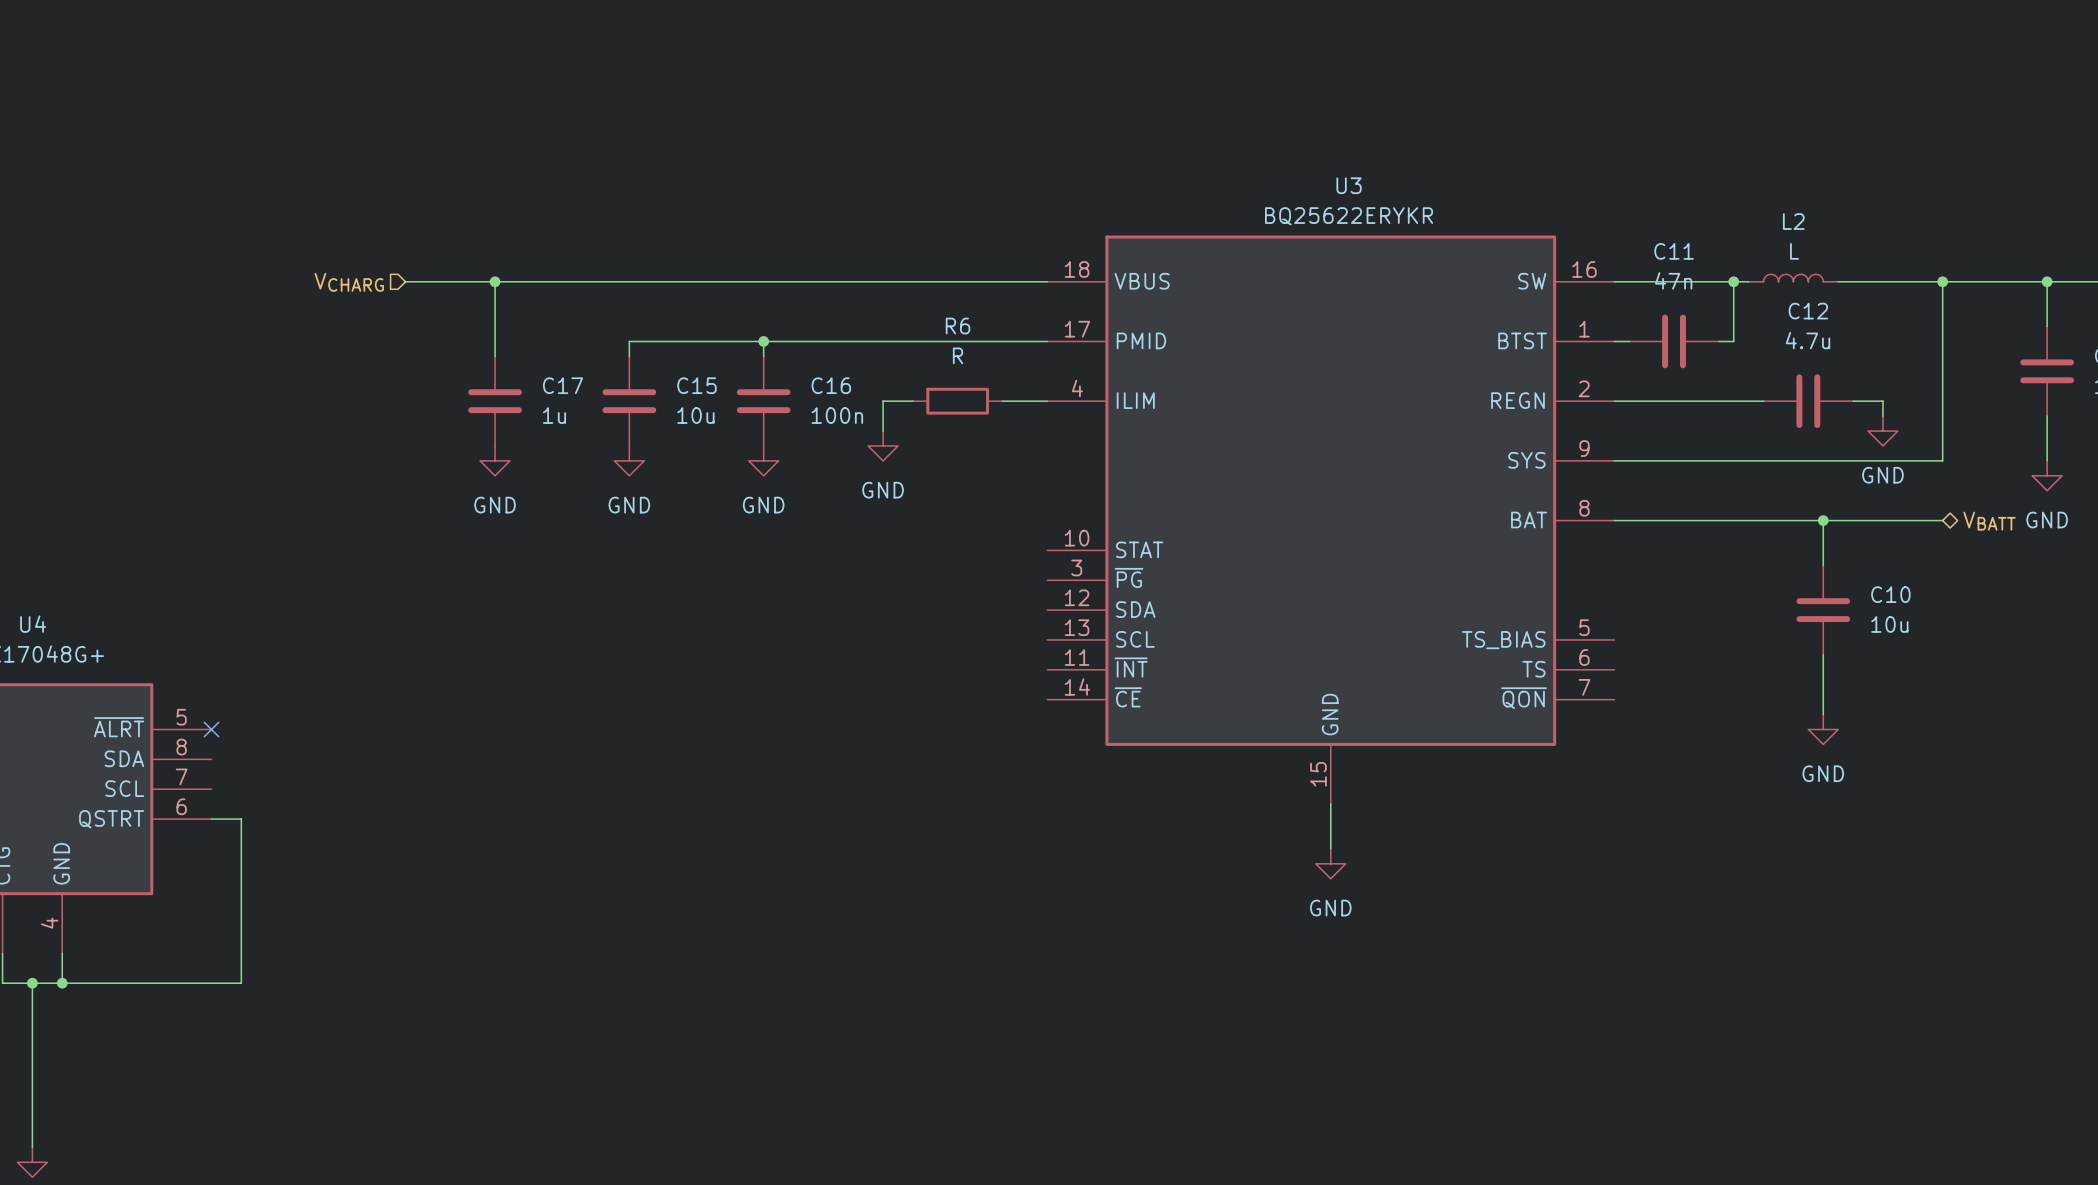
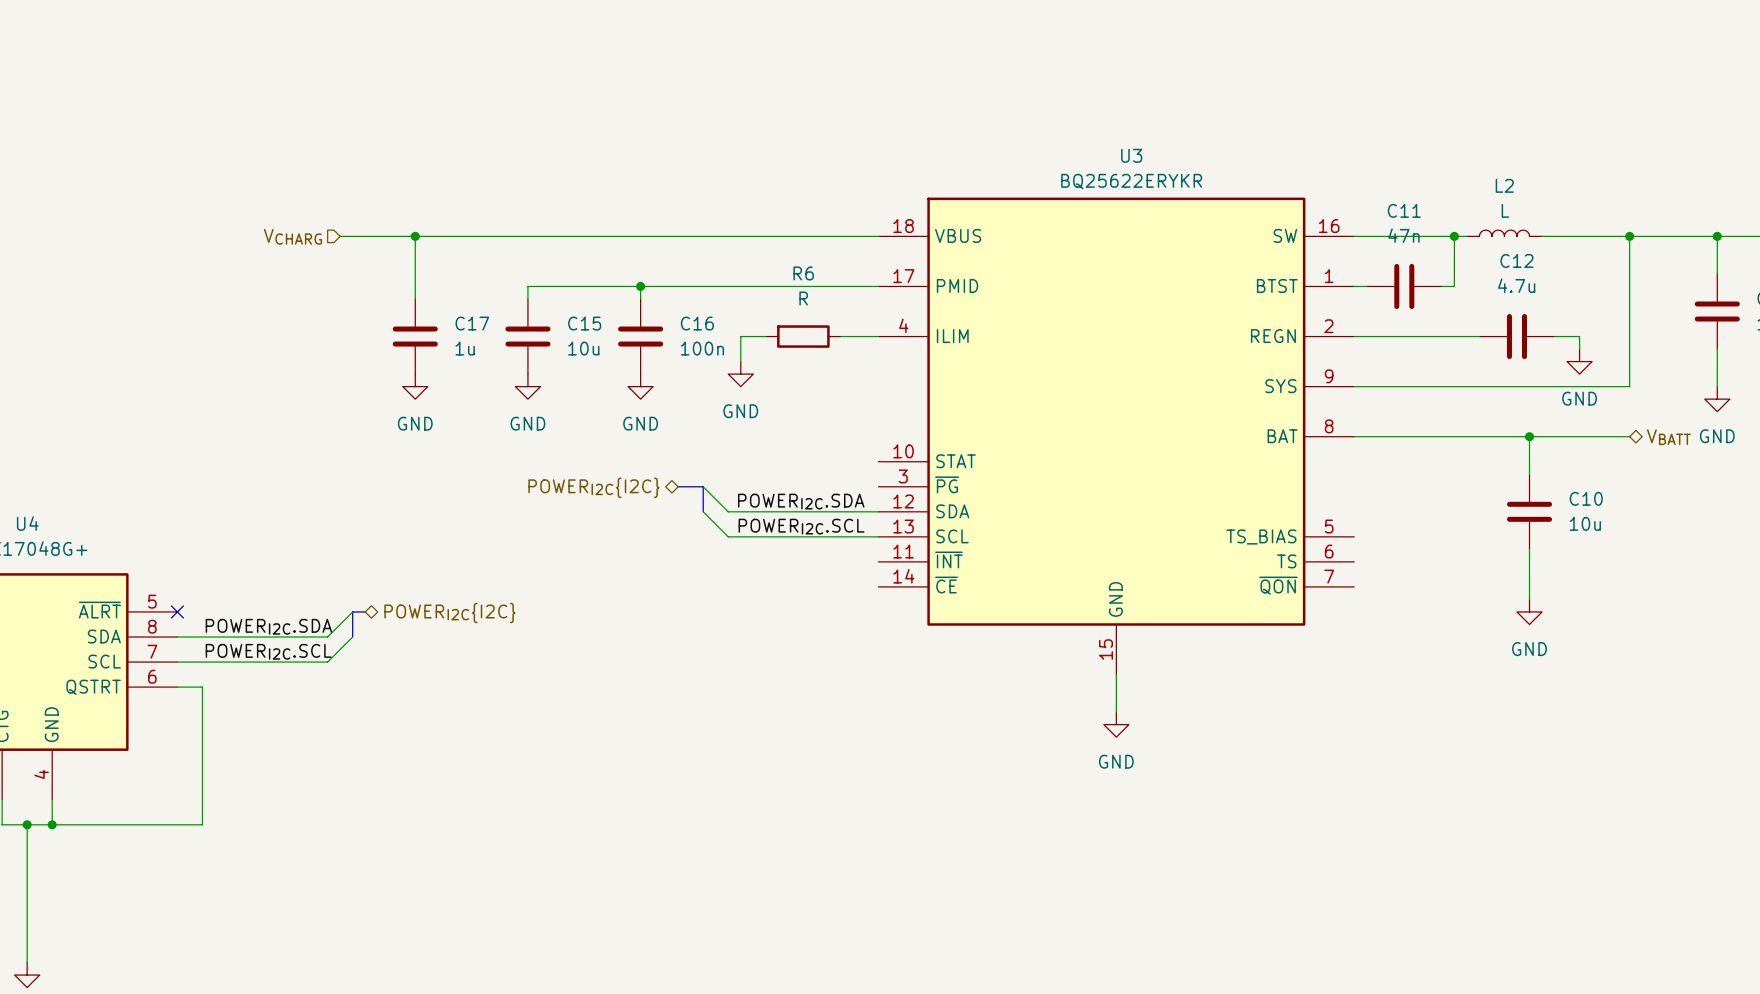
bus: none -> (678, 486) (703, 486) (703, 511)
wire: none -> (703, 486) (728, 511) (878, 511)
hierarchical label: none -> POWERI2C{I2C} (593, 487)
label: none -> POWERI2C.SDA (801, 501)
wire: none -> (703, 511) (728, 536) (878, 536)
label: none -> POWERI2C.SCL (801, 526)
wire: none -> (352, 611) (327, 637) (177, 637)
bus: none -> (365, 611) (352, 611) (352, 637)
hierarchical label: none -> POWERI2C{I2C} (449, 612)
label: none -> POWERI2C.SDA (268, 626)
wire: none -> (352, 637) (327, 662) (177, 662)
label: none -> POWERI2C.SCL (268, 651)

